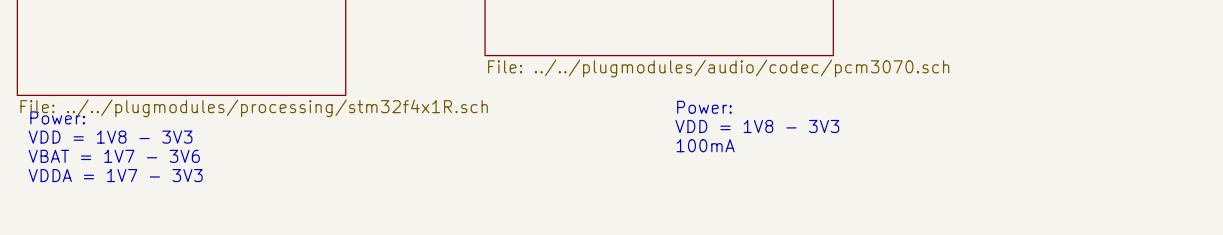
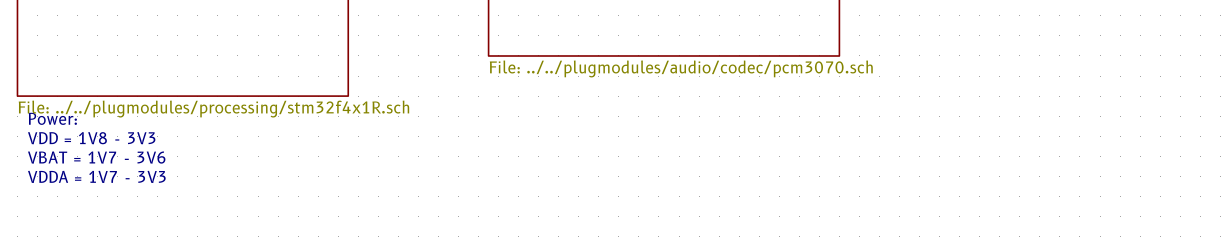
text: Power: (704, 107) -> none
text: VDD = 1V8 - 3V3 (757, 126) -> none
text: 100mA (705, 145) -> none

